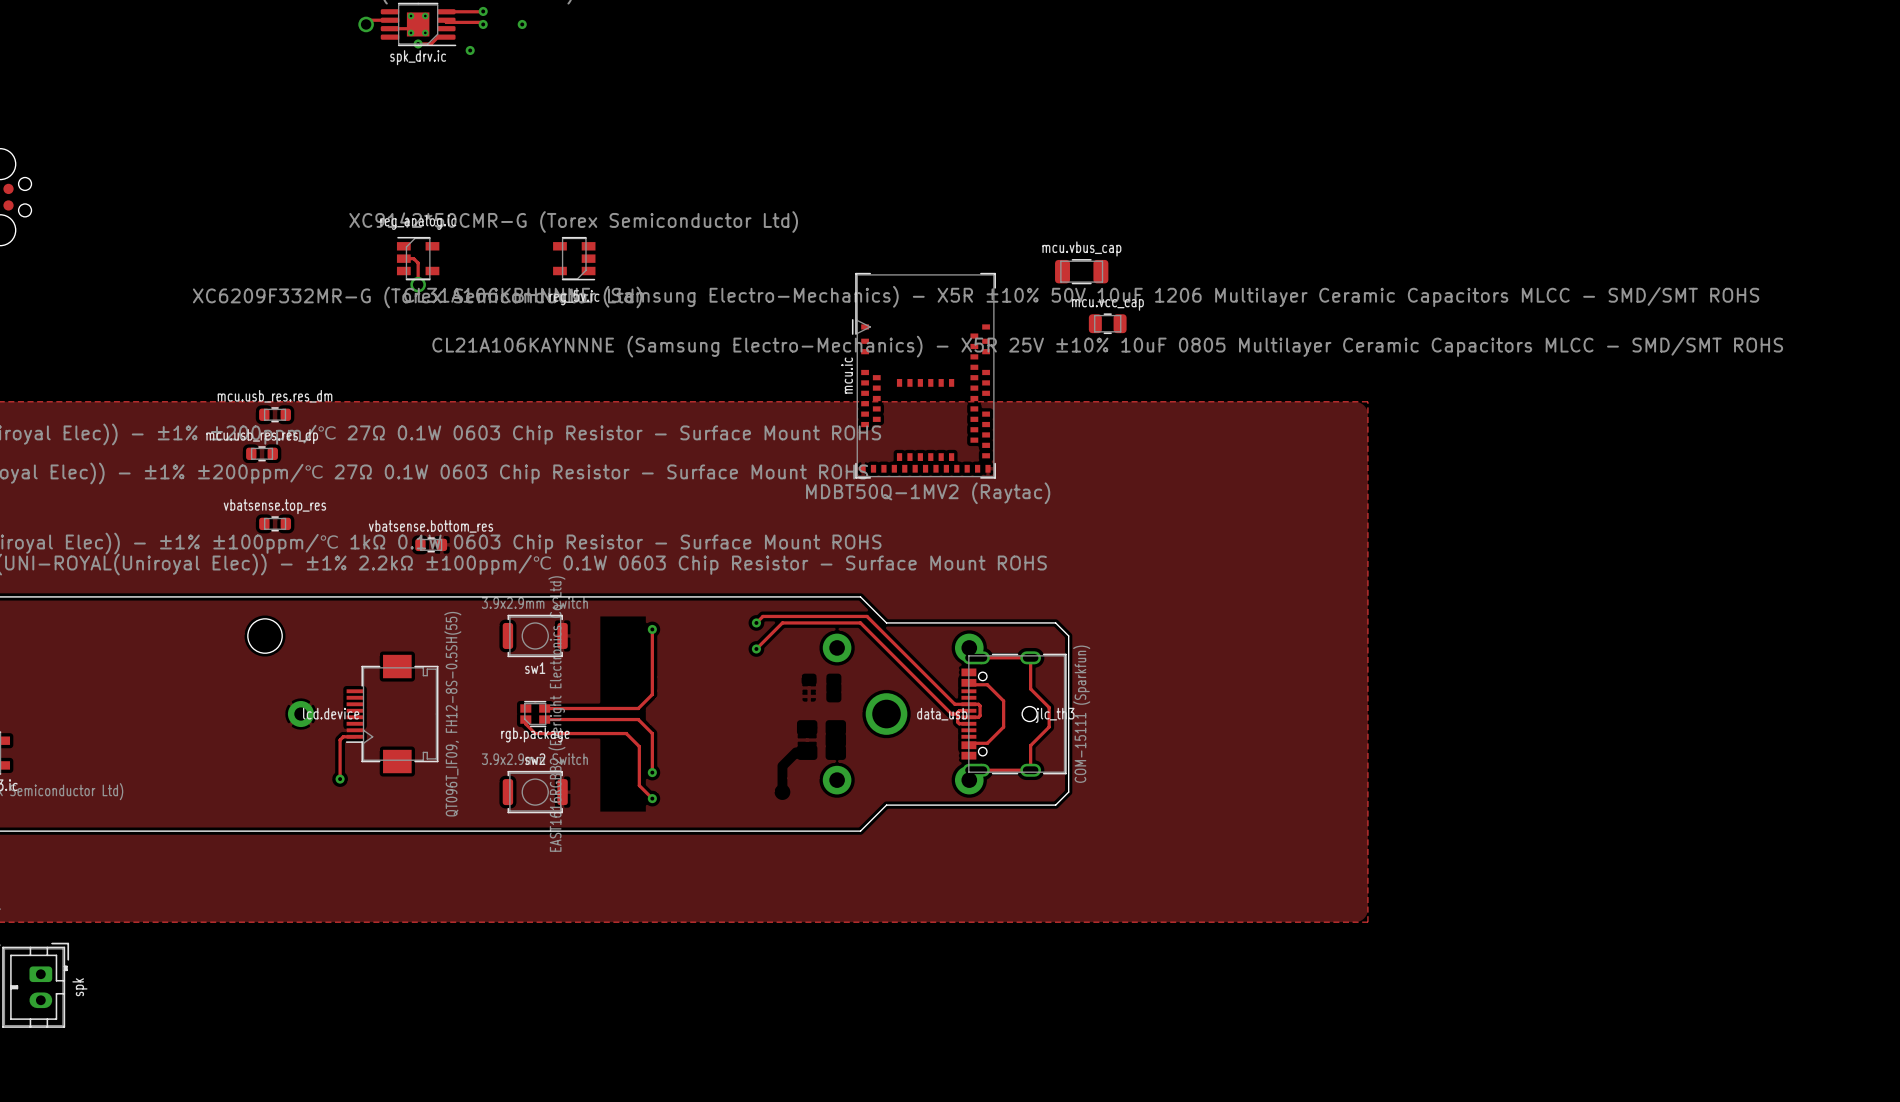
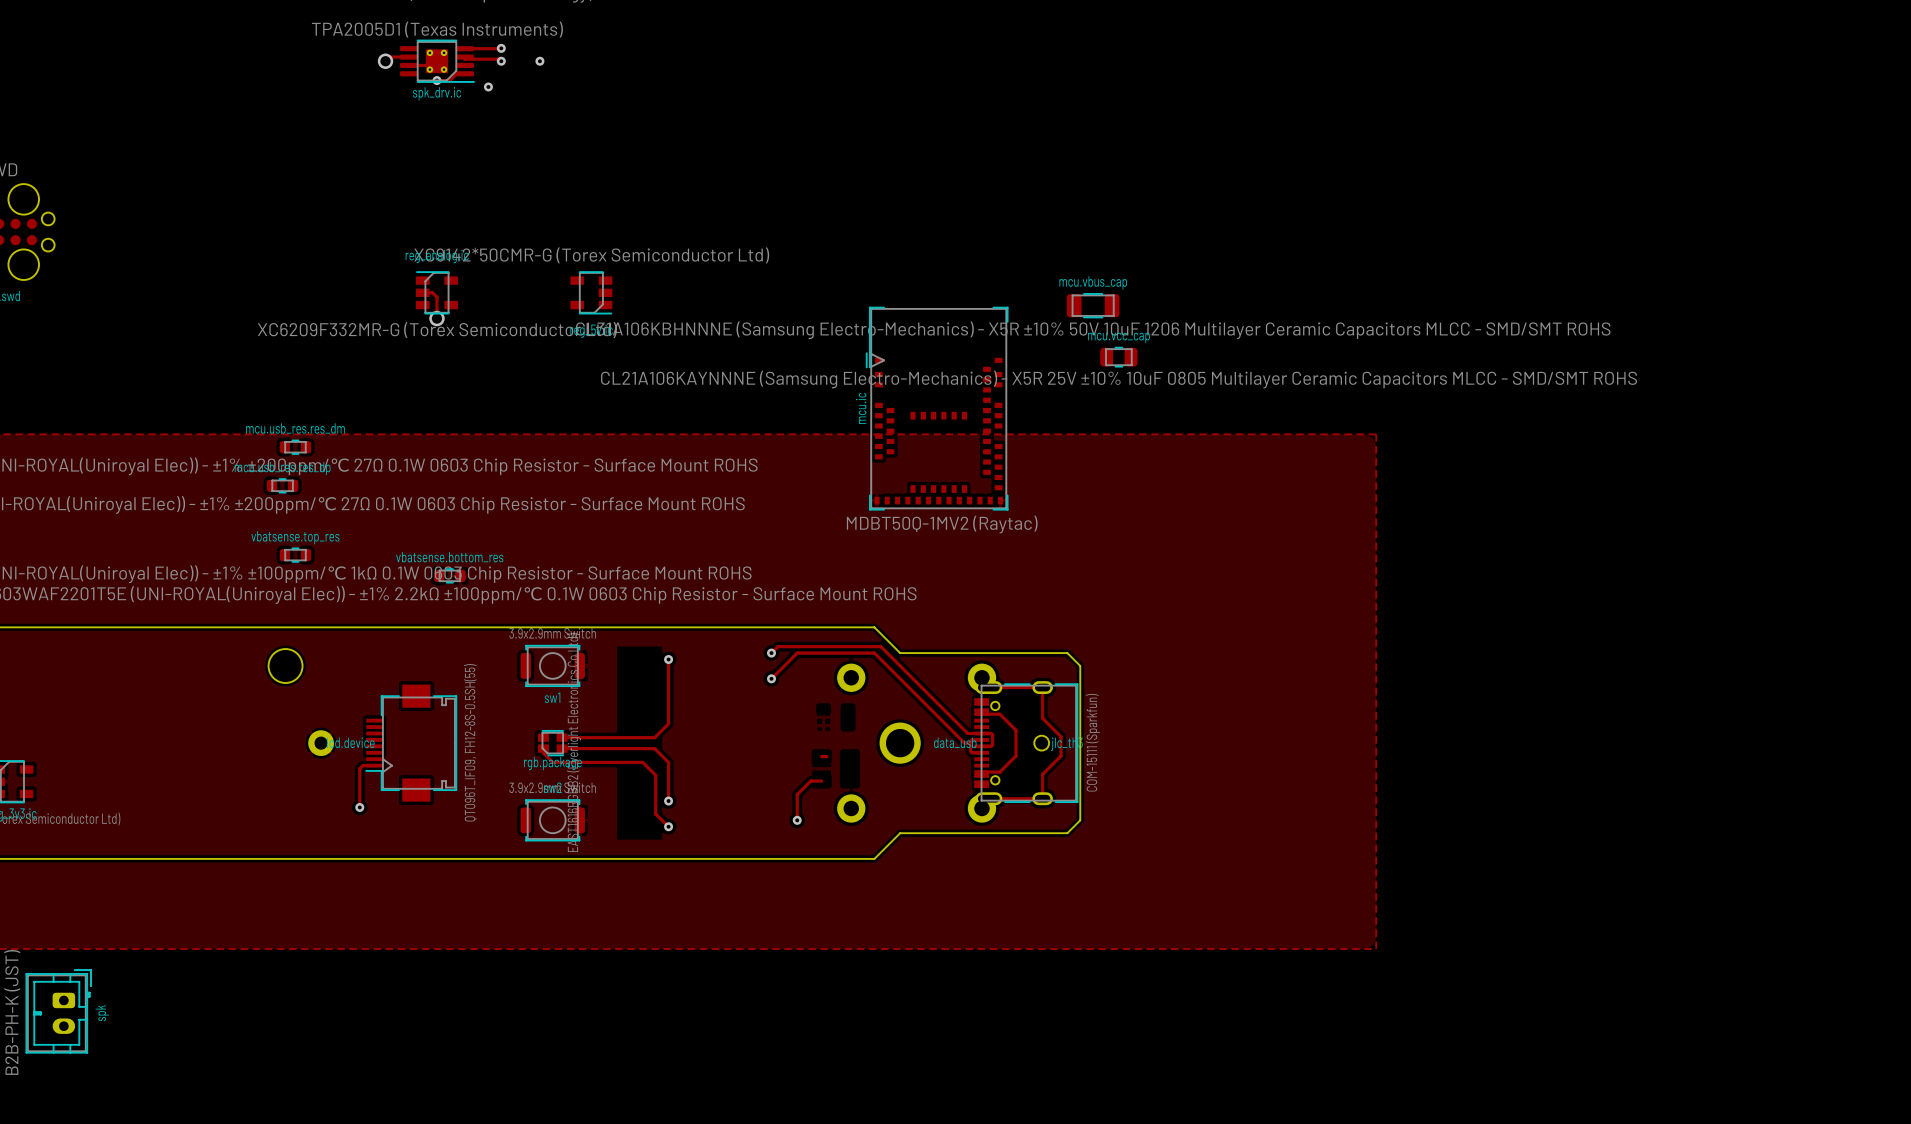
track: none -> (821, 756) (827, 756)
track: none -> (821, 781) (810, 781) (797, 794) (797, 820)
via: none -> (797, 820)

